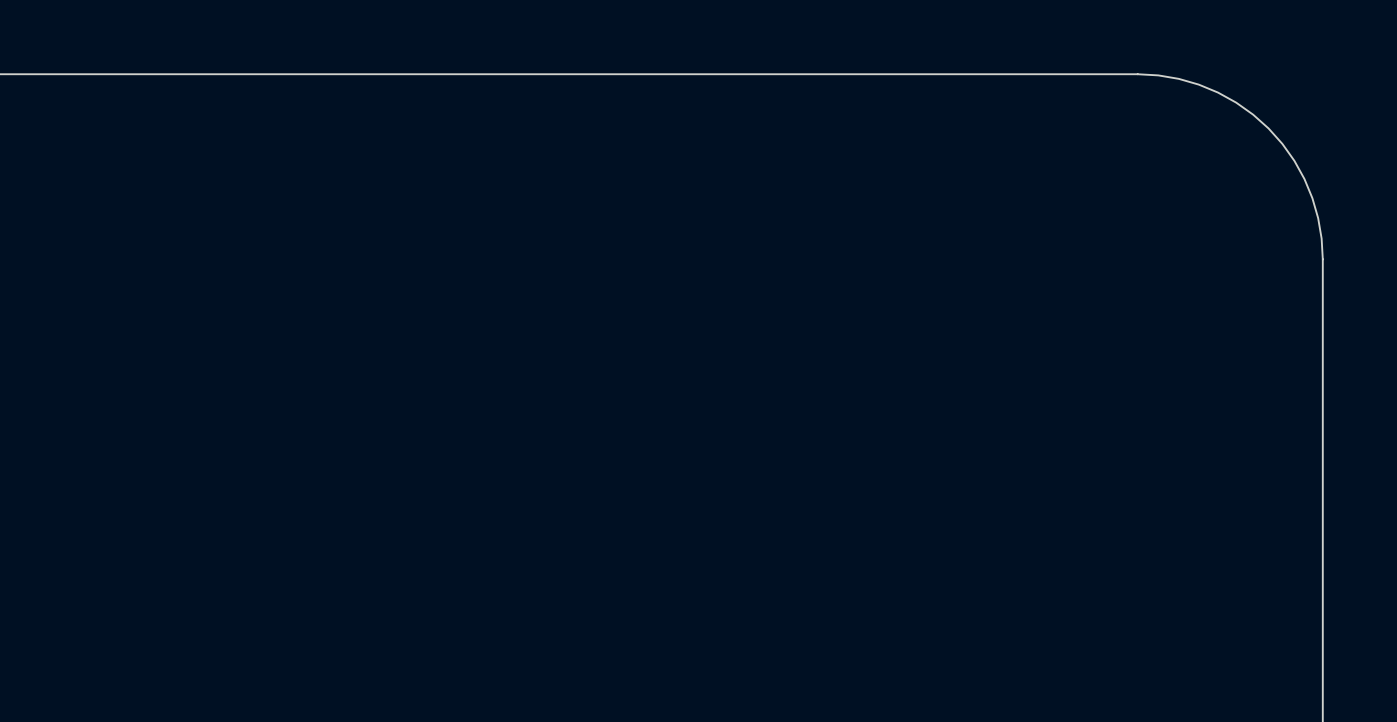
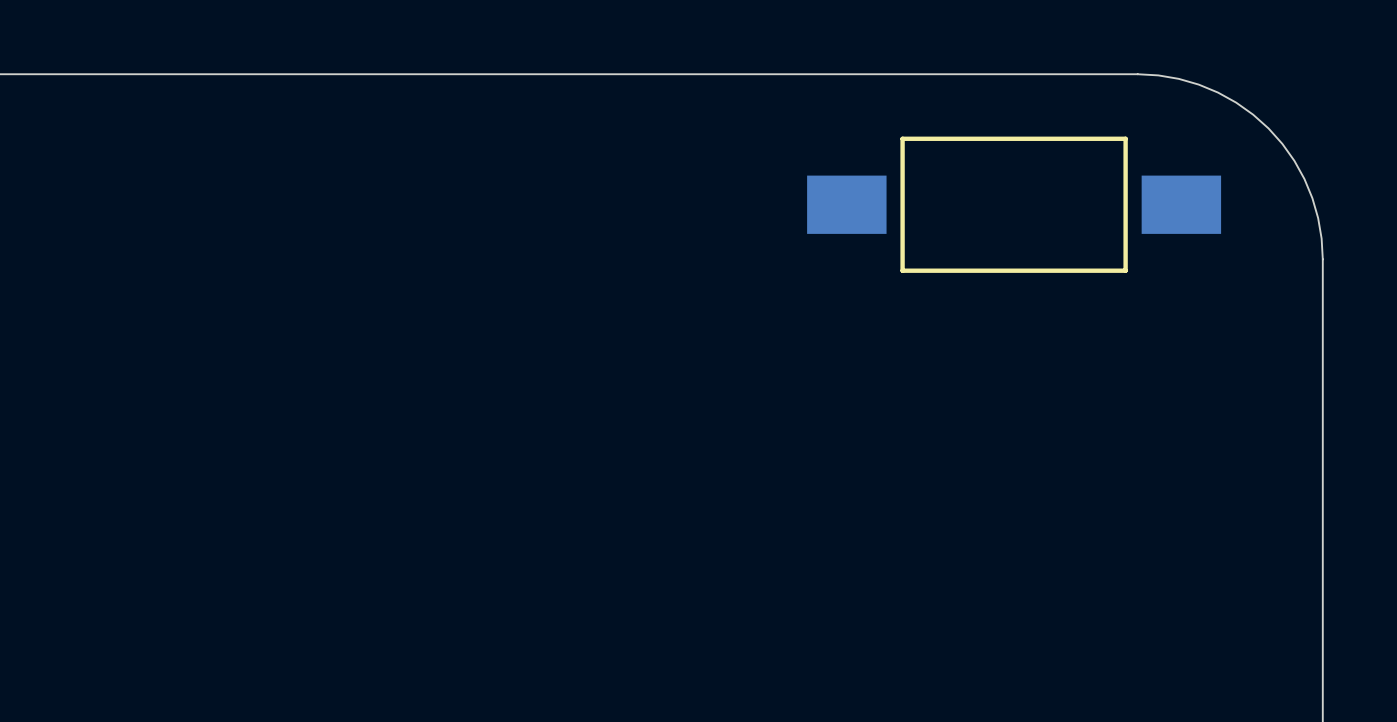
part: none -> (1014, 204)

